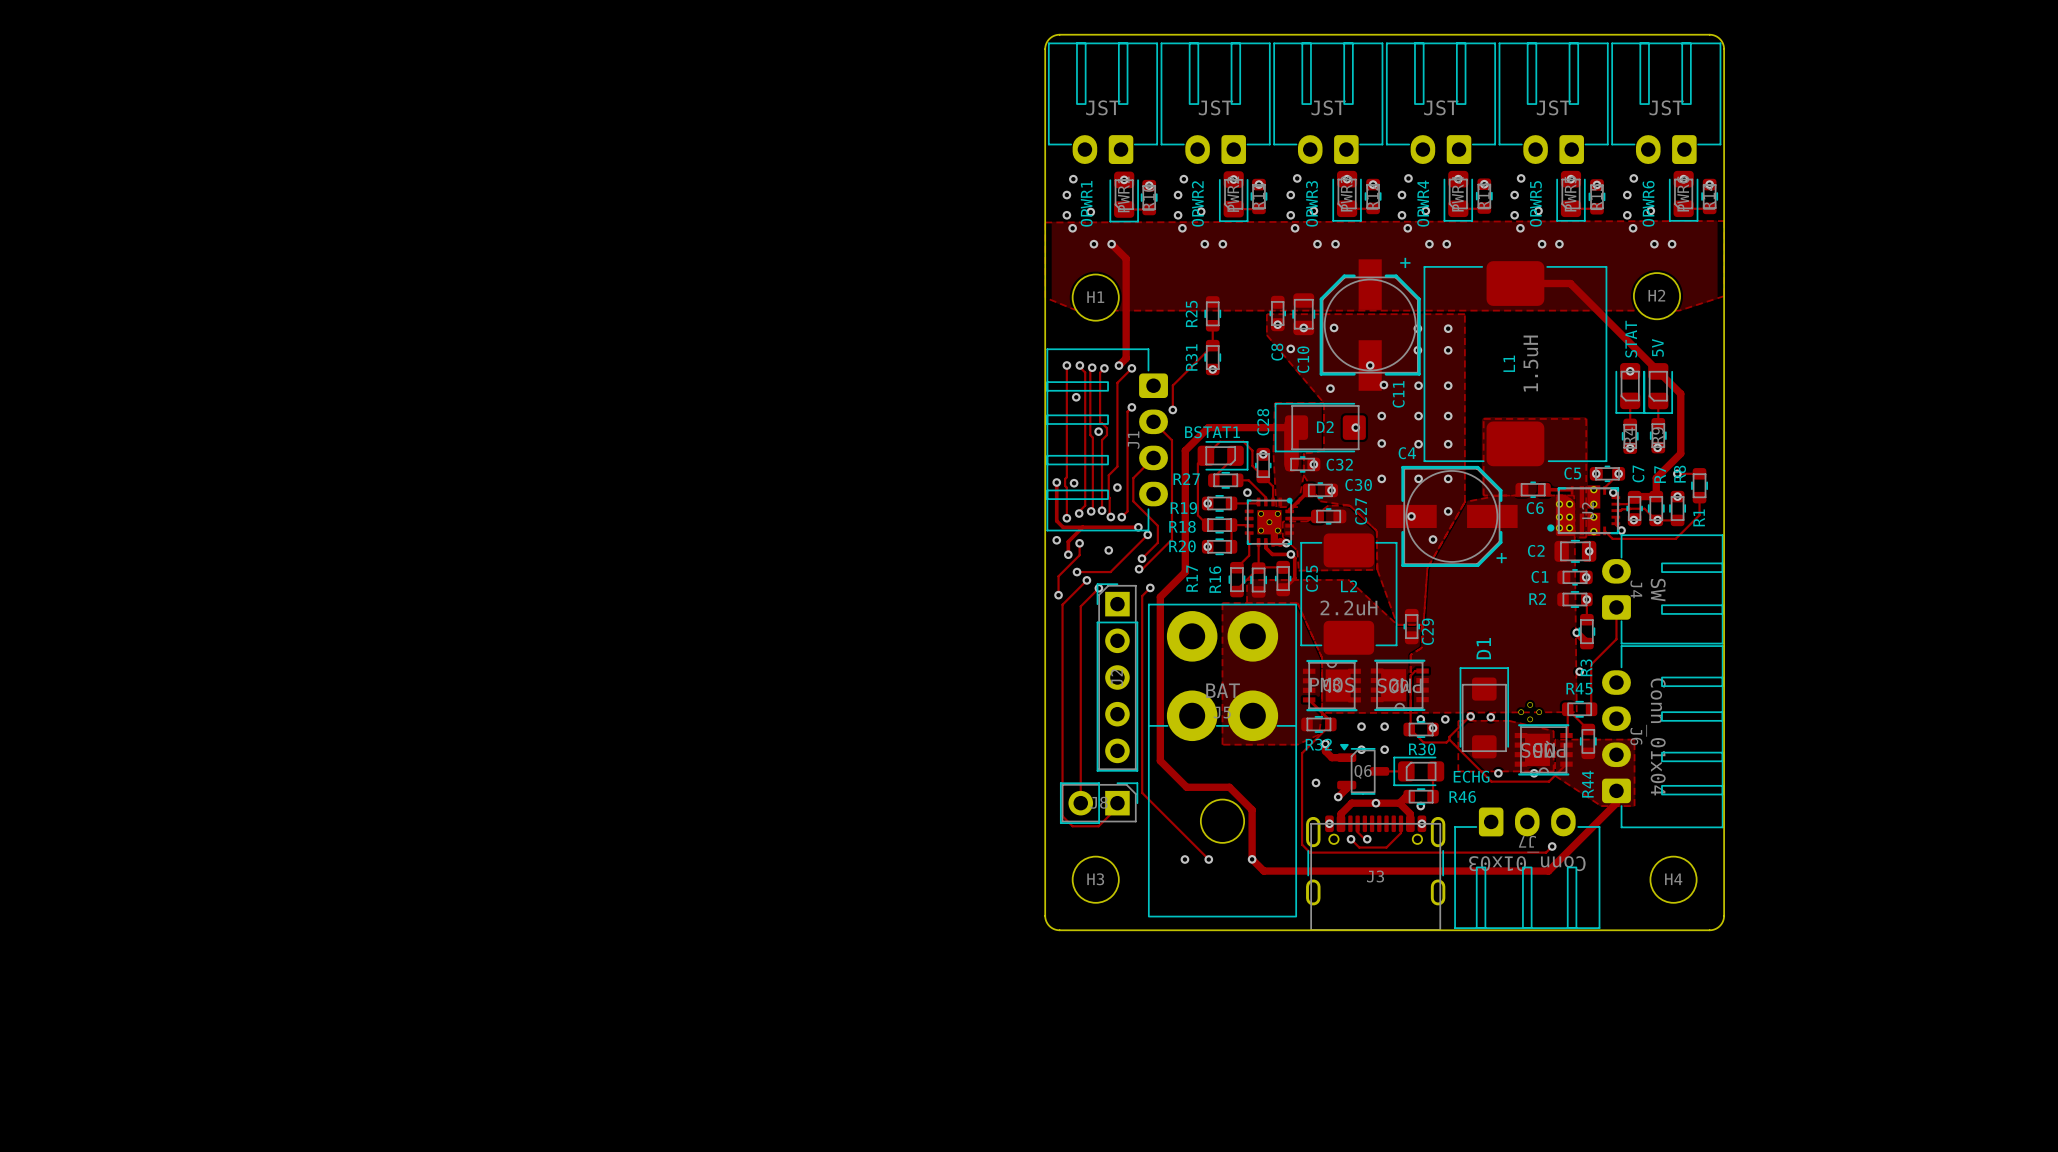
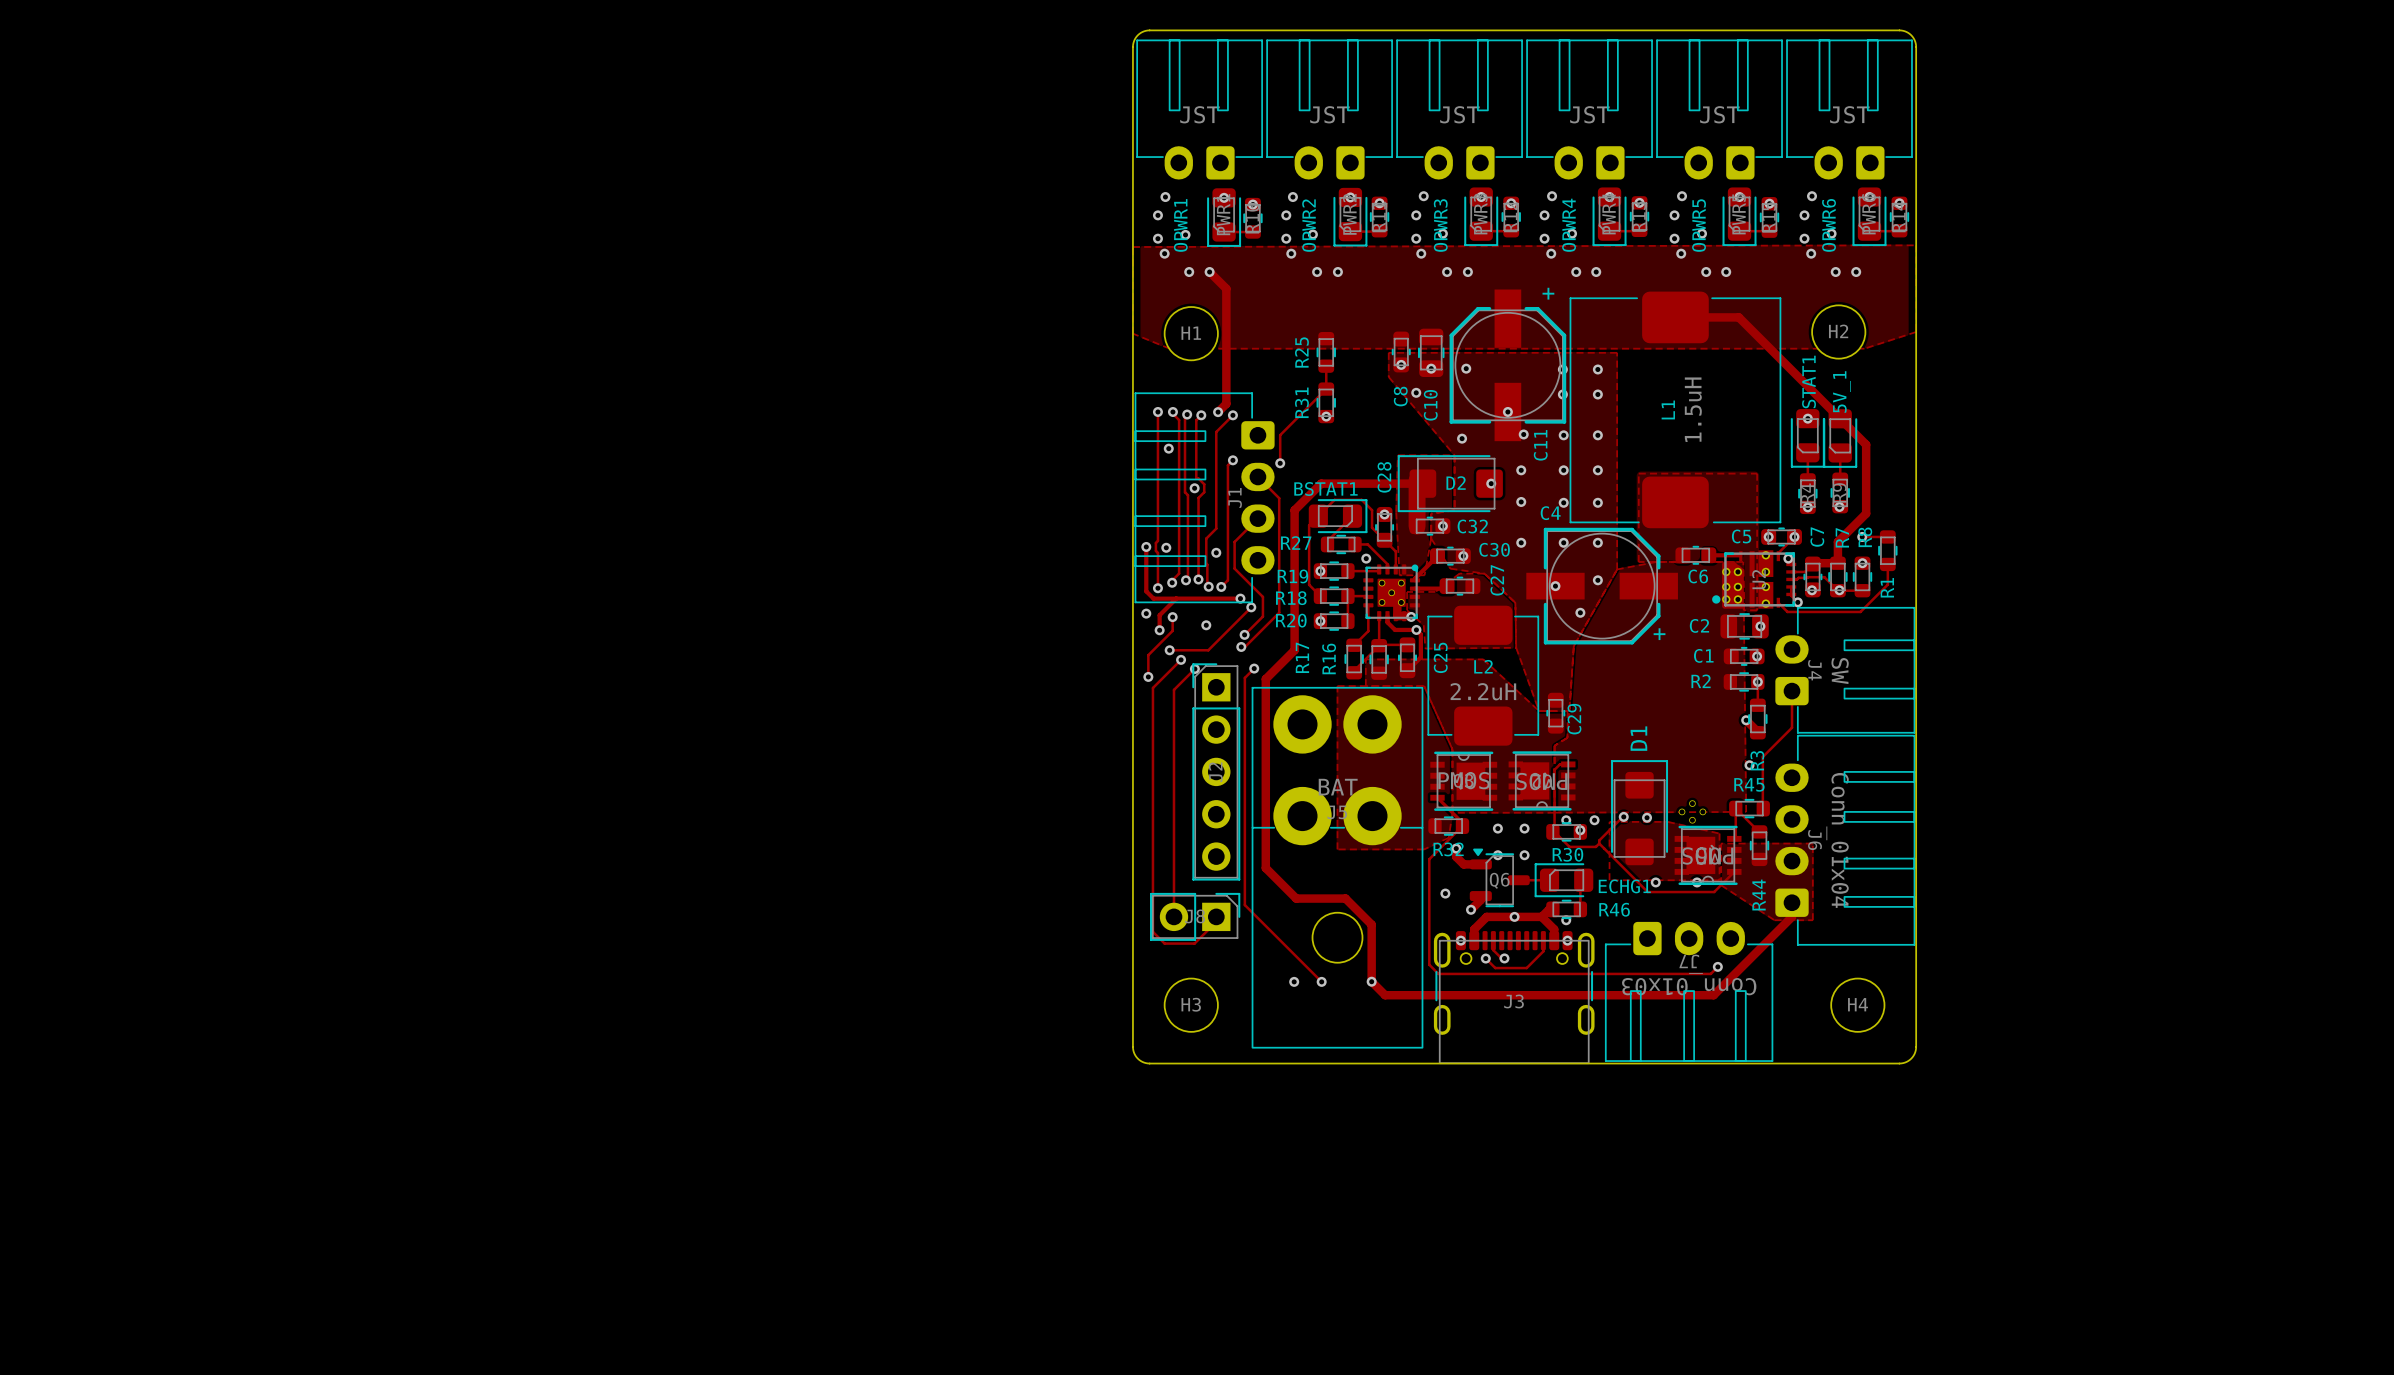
STAT name: STAT (1631, 339) -> STAT1 (1809, 381)
5V name: 5V (1657, 347) -> 5V_1 (1841, 391)
ECHG name: ECHG (1471, 776) -> ECHG1 (1624, 886)

